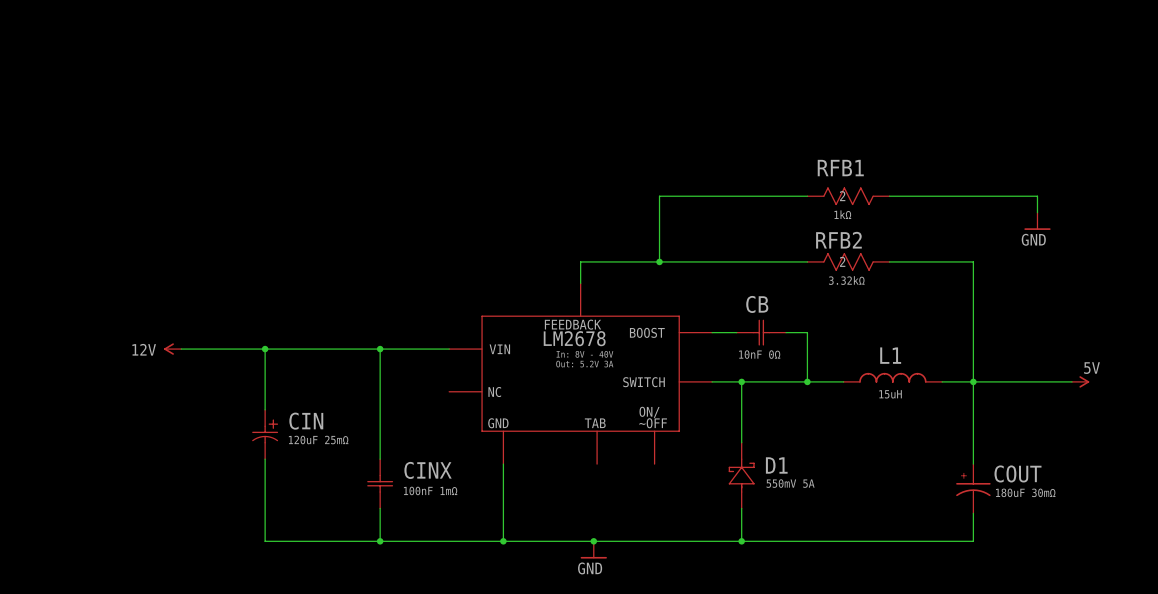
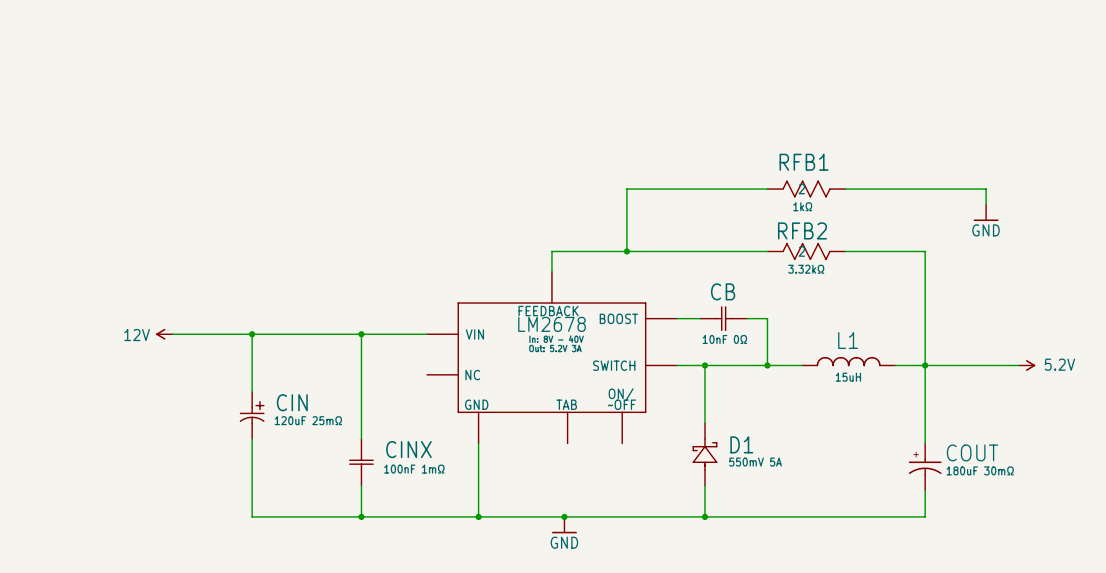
power symbol: 5V (1080, 381) -> 5.2V (1027, 365)

